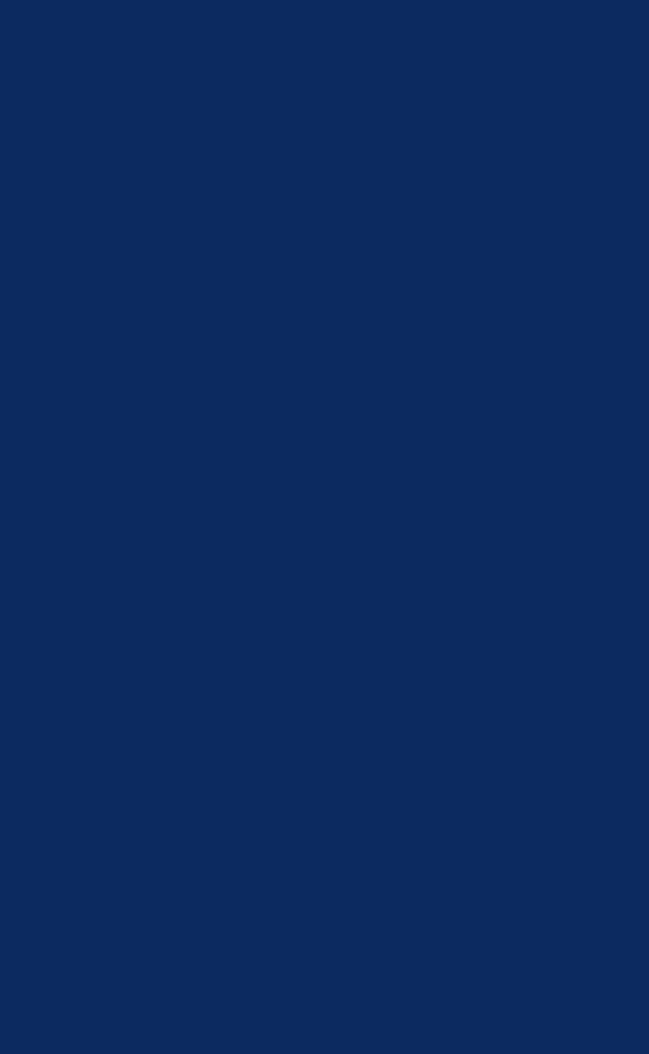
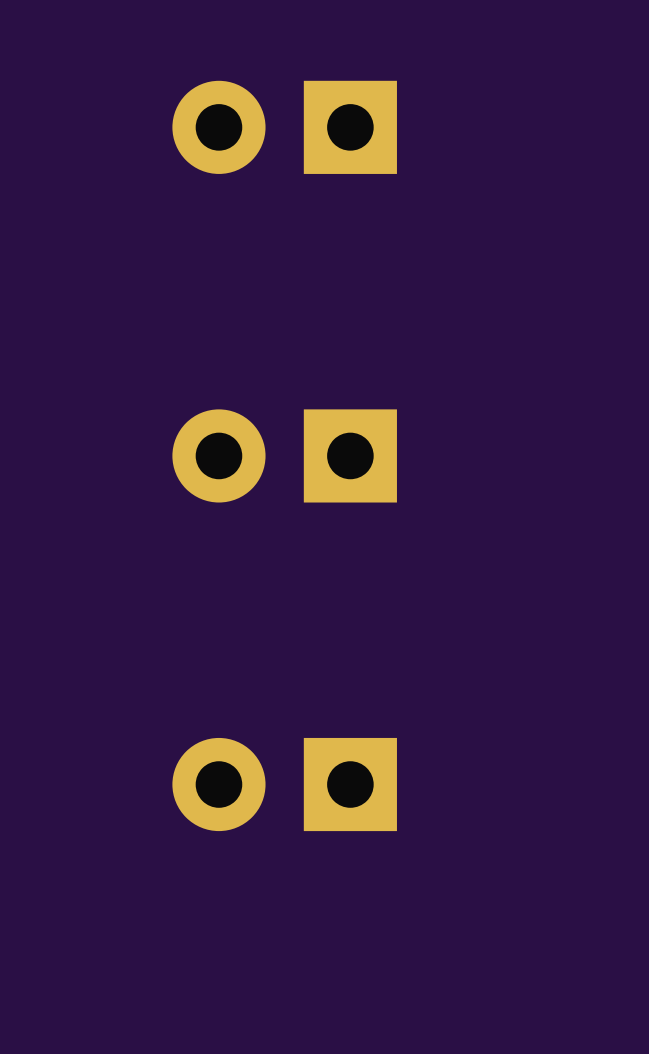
part: none -> (284, 127)
part: none -> (284, 455)
part: none -> (284, 784)

